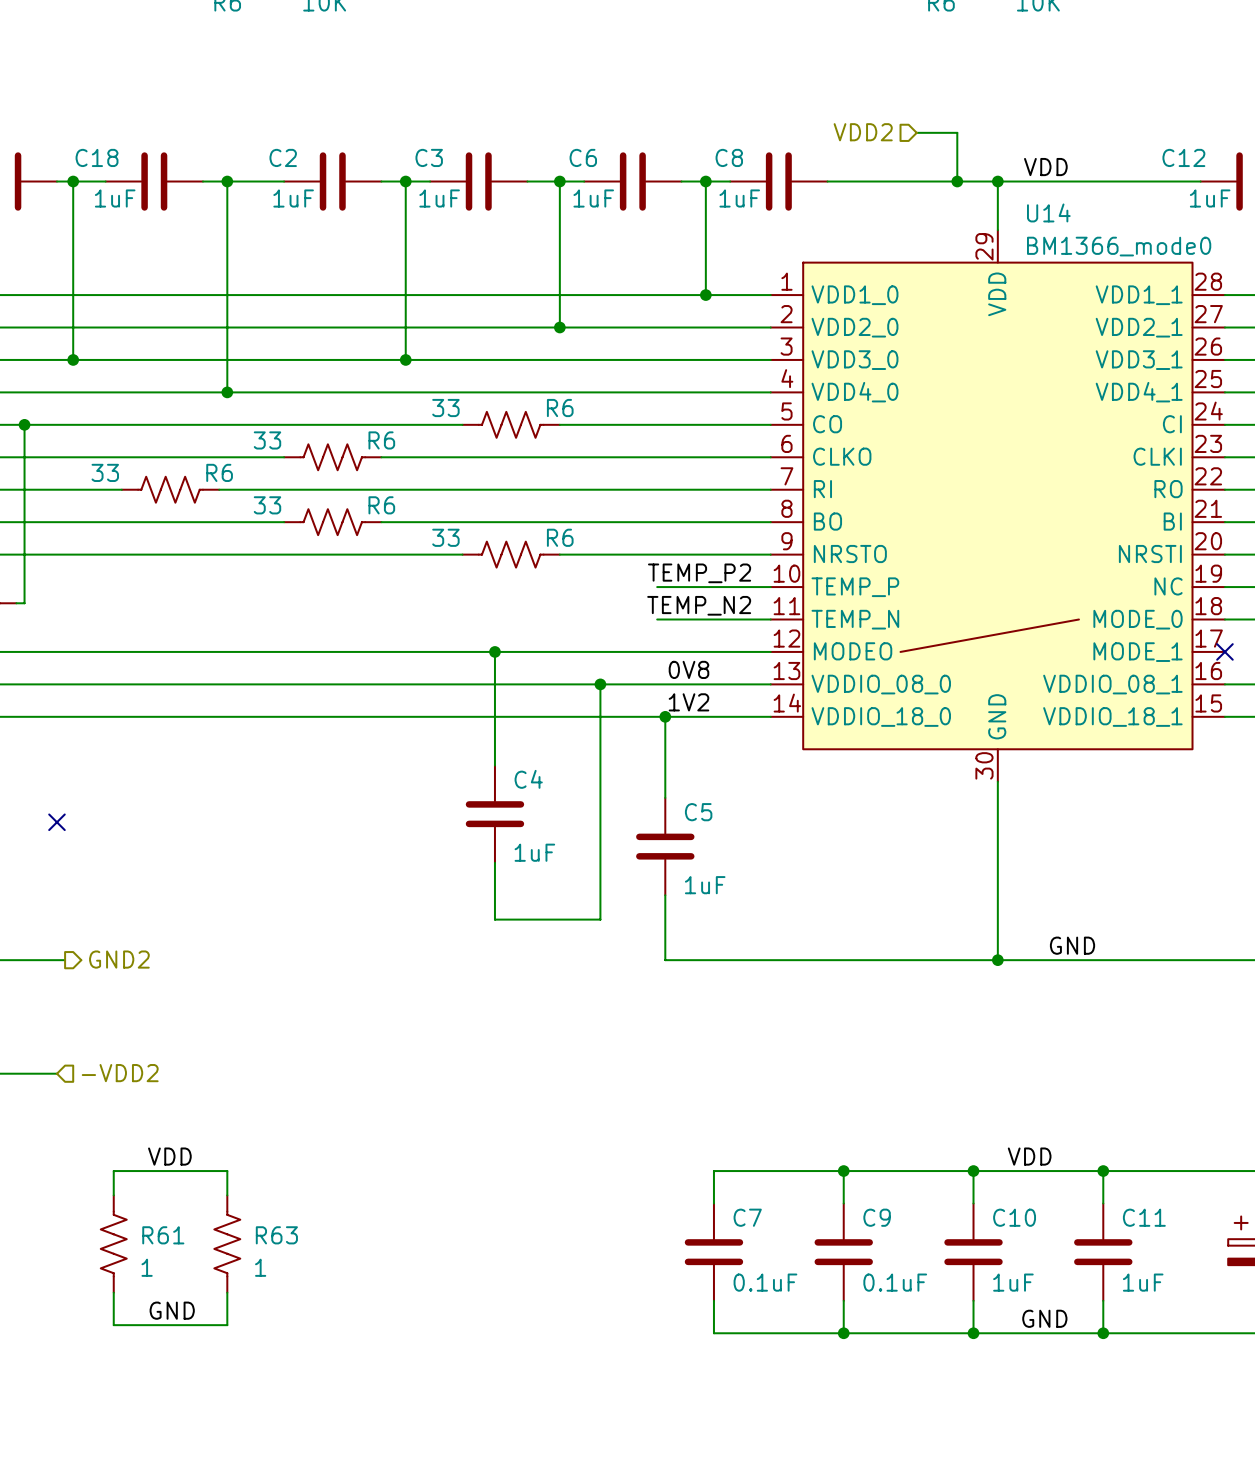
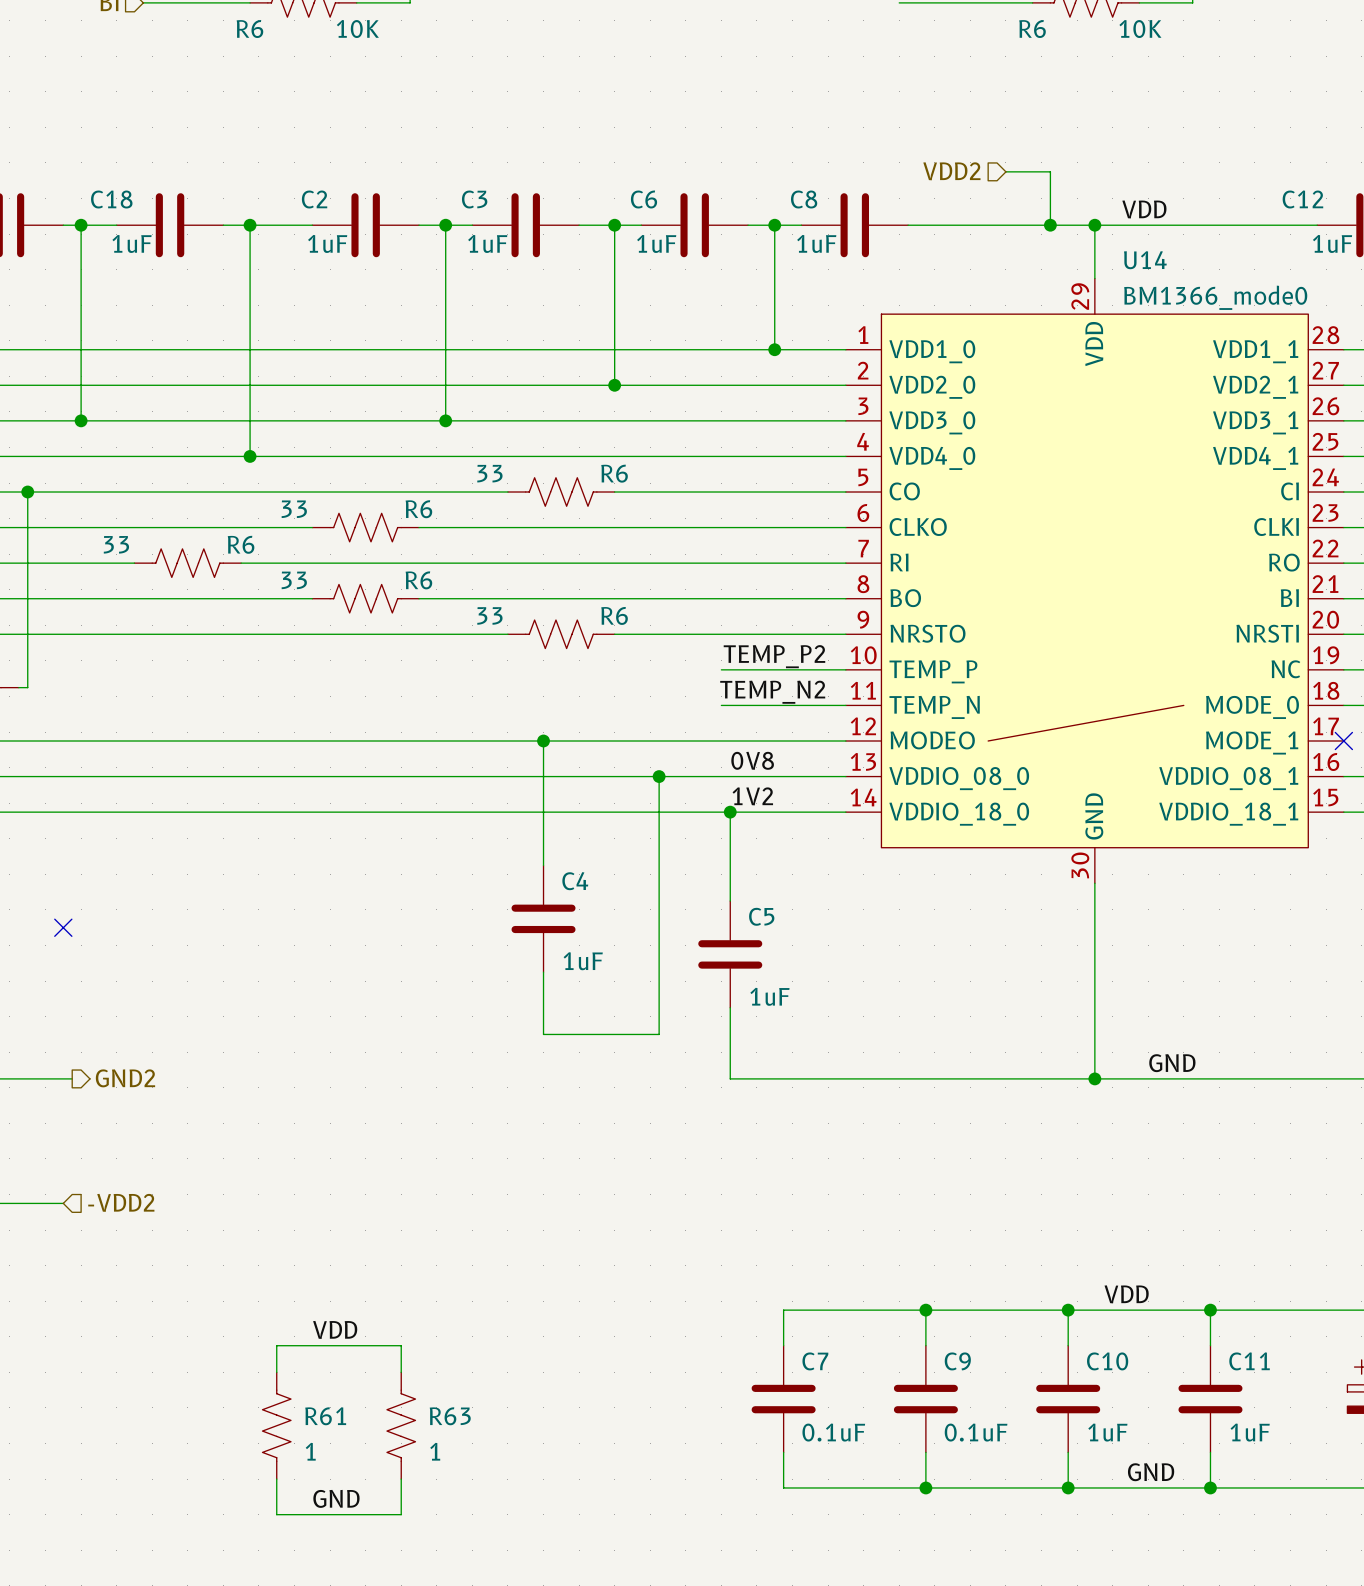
label position: VDD (169, 1156) -> VDD (335, 1329)
wire: (113, 1195) (113, 1171) (227, 1171) (227, 1195) -> (276, 1372) (276, 1345) (401, 1345) (401, 1372)
R61 position: (113, 1244) -> (276, 1425)
R63 position: (227, 1244) -> (401, 1425)
wire: (113, 1292) (113, 1325) (227, 1325) (227, 1292) -> (276, 1479) (276, 1514) (401, 1514) (401, 1479)
label position: GND (172, 1310) -> GND (336, 1498)

